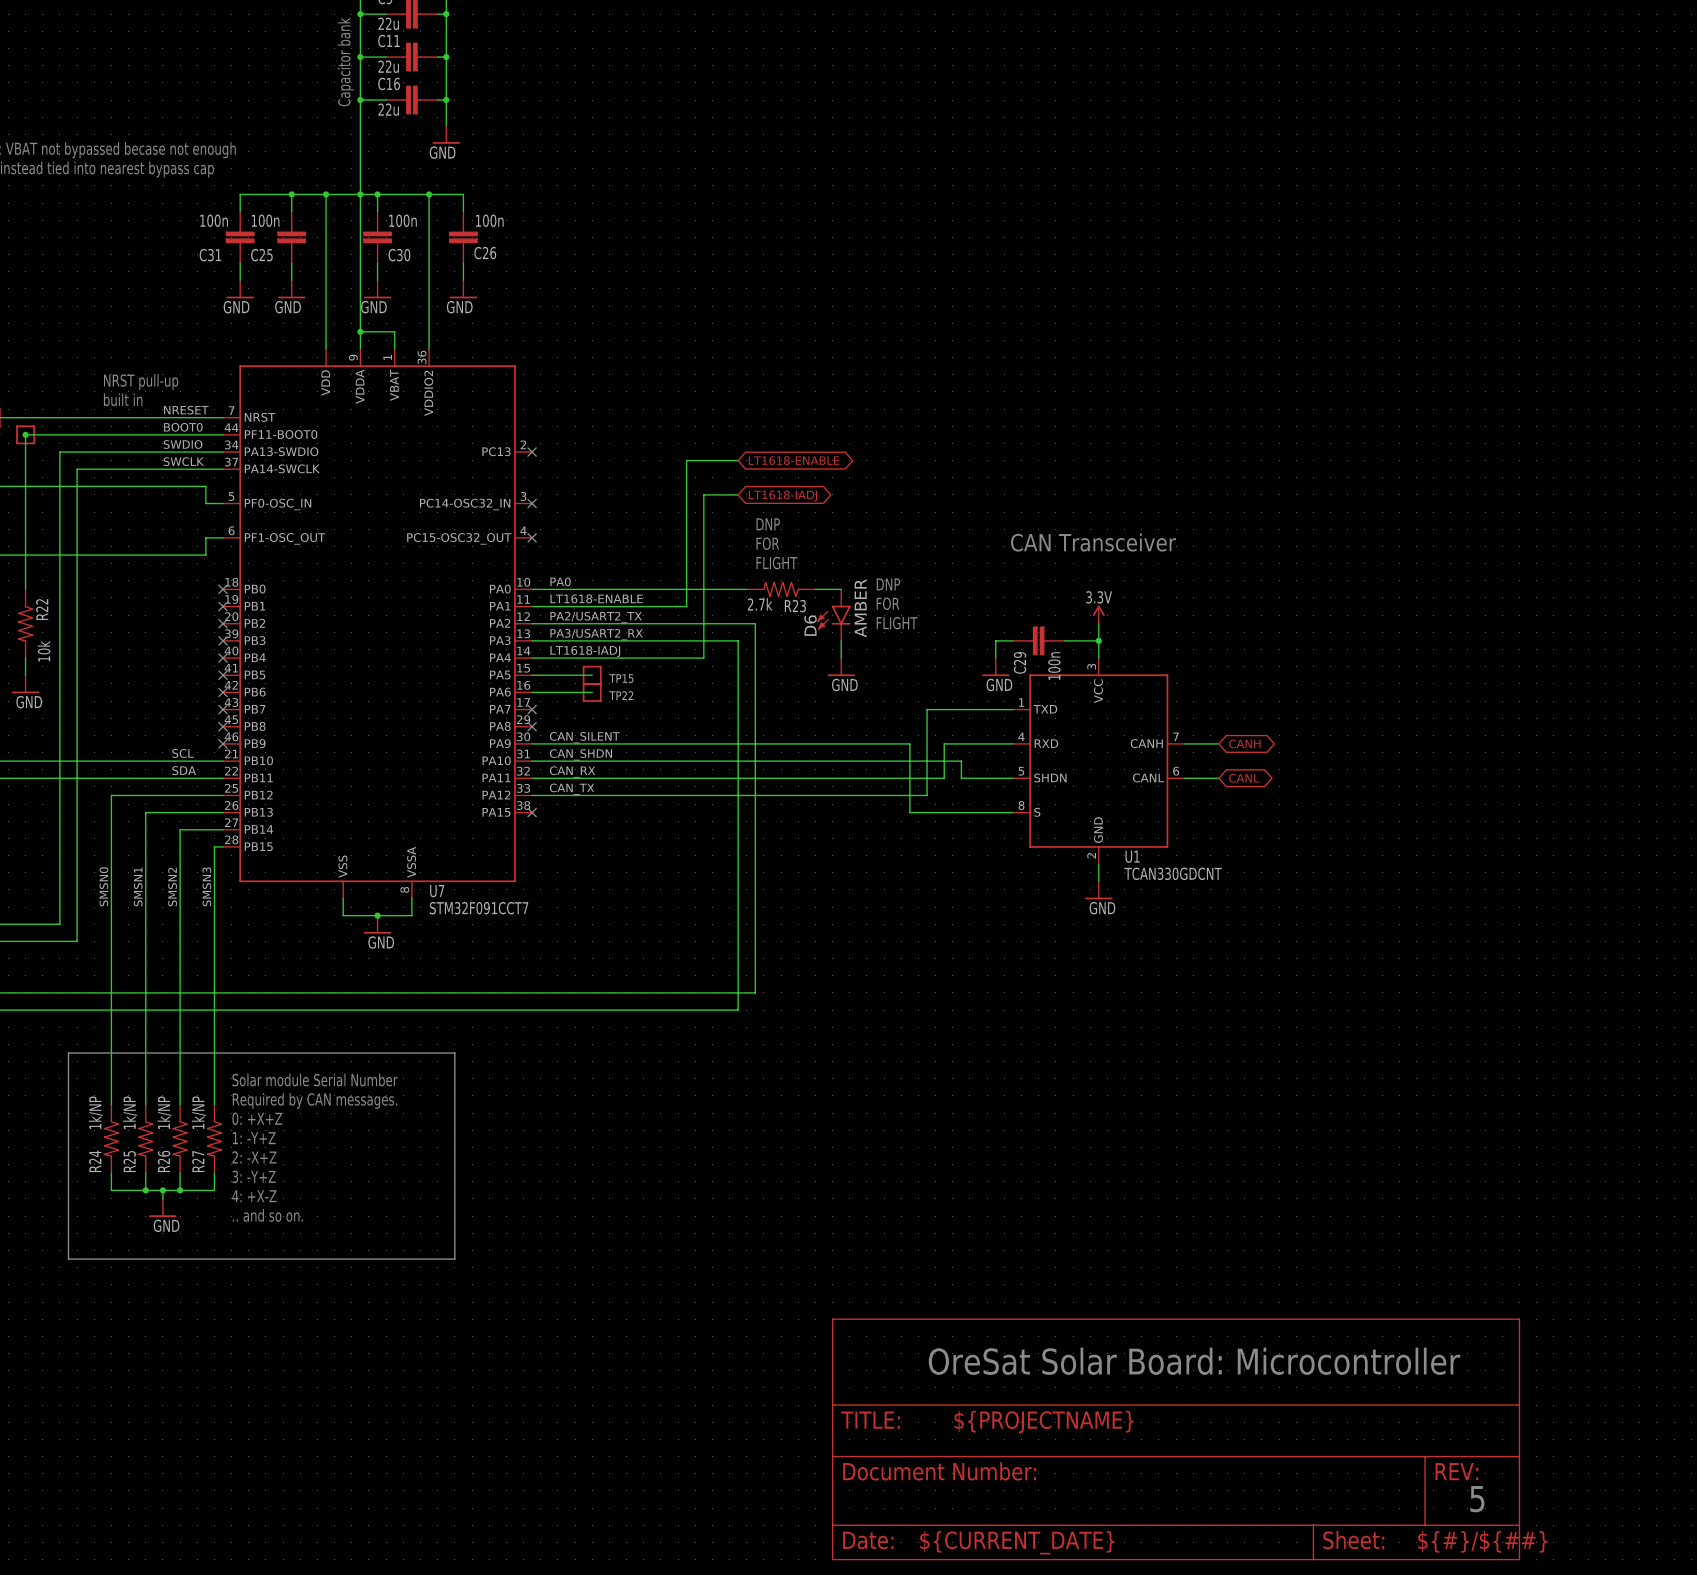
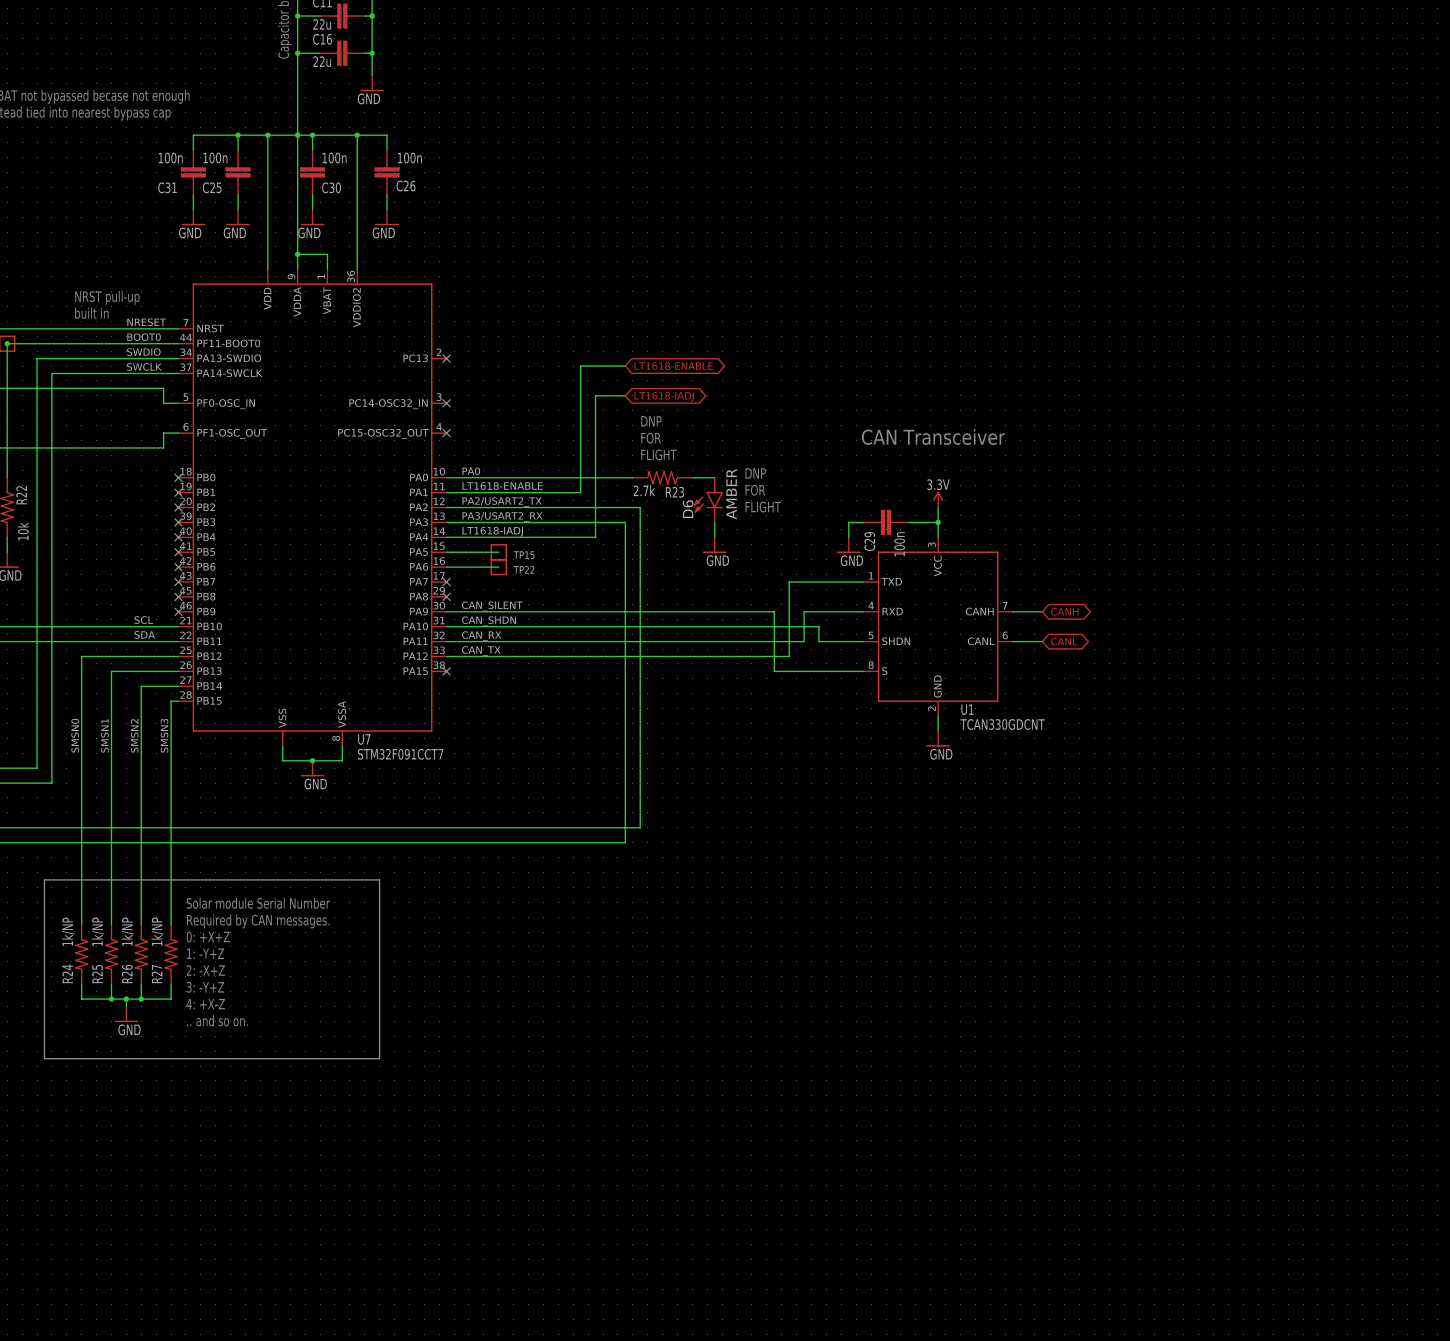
text: OreSat Solar Board: Microcontroller (1194, 1361) -> none
power symbol: (1176, 1439) -> none
text: 5 (1477, 1499) -> none

